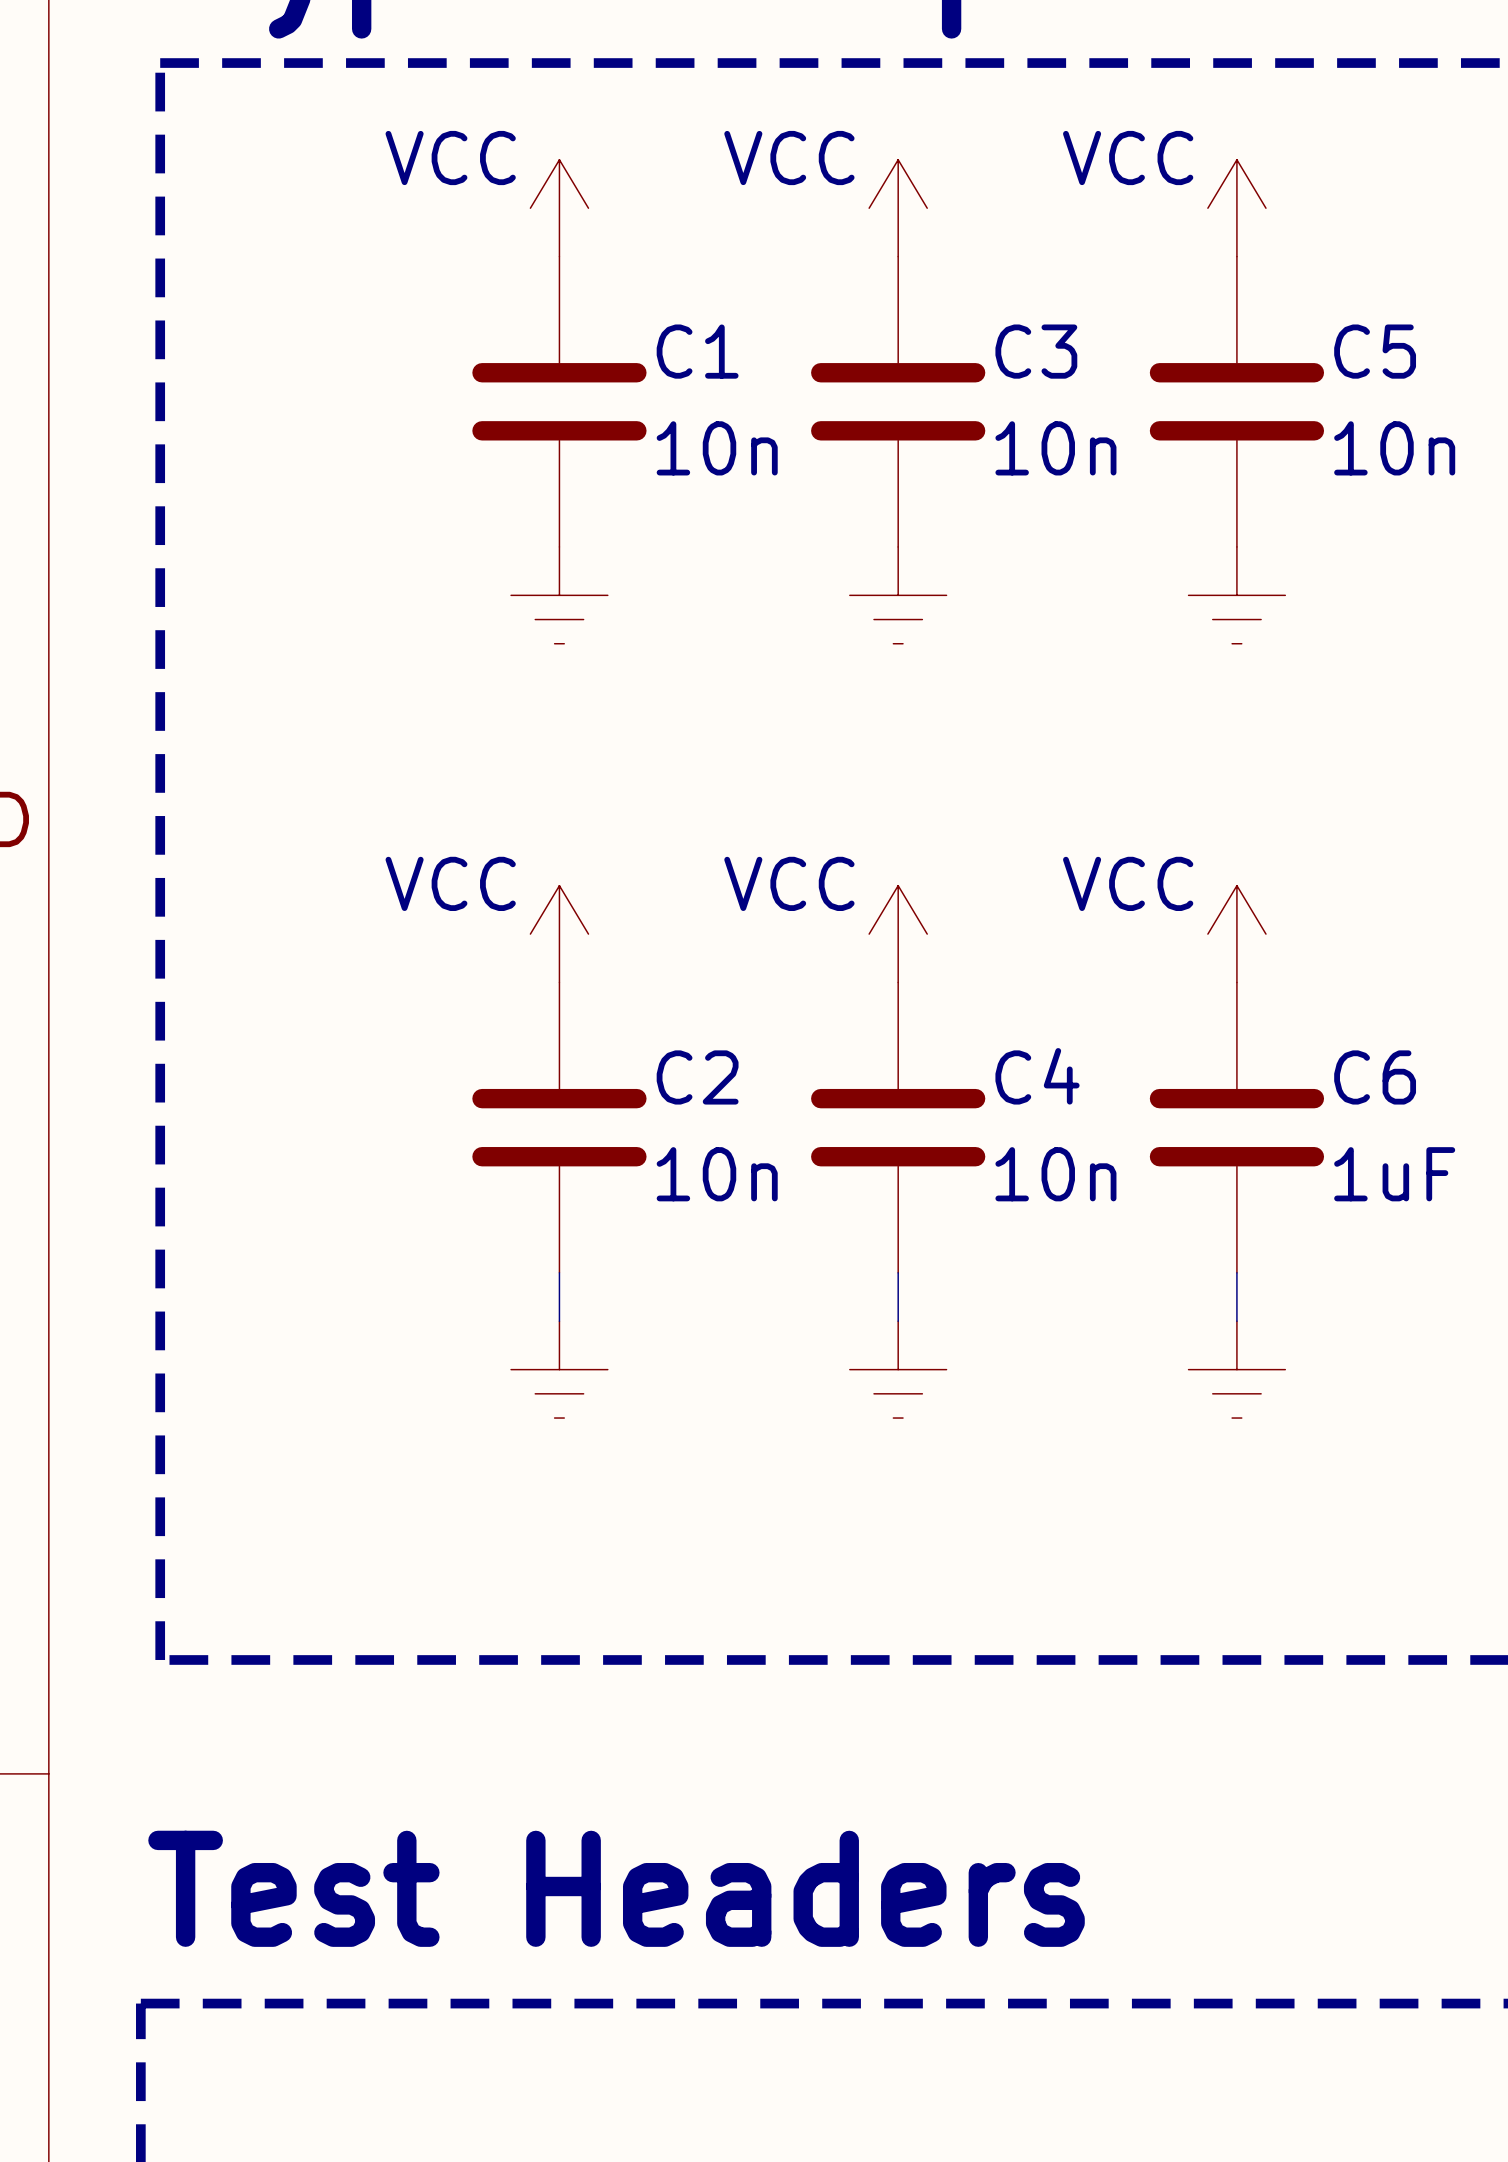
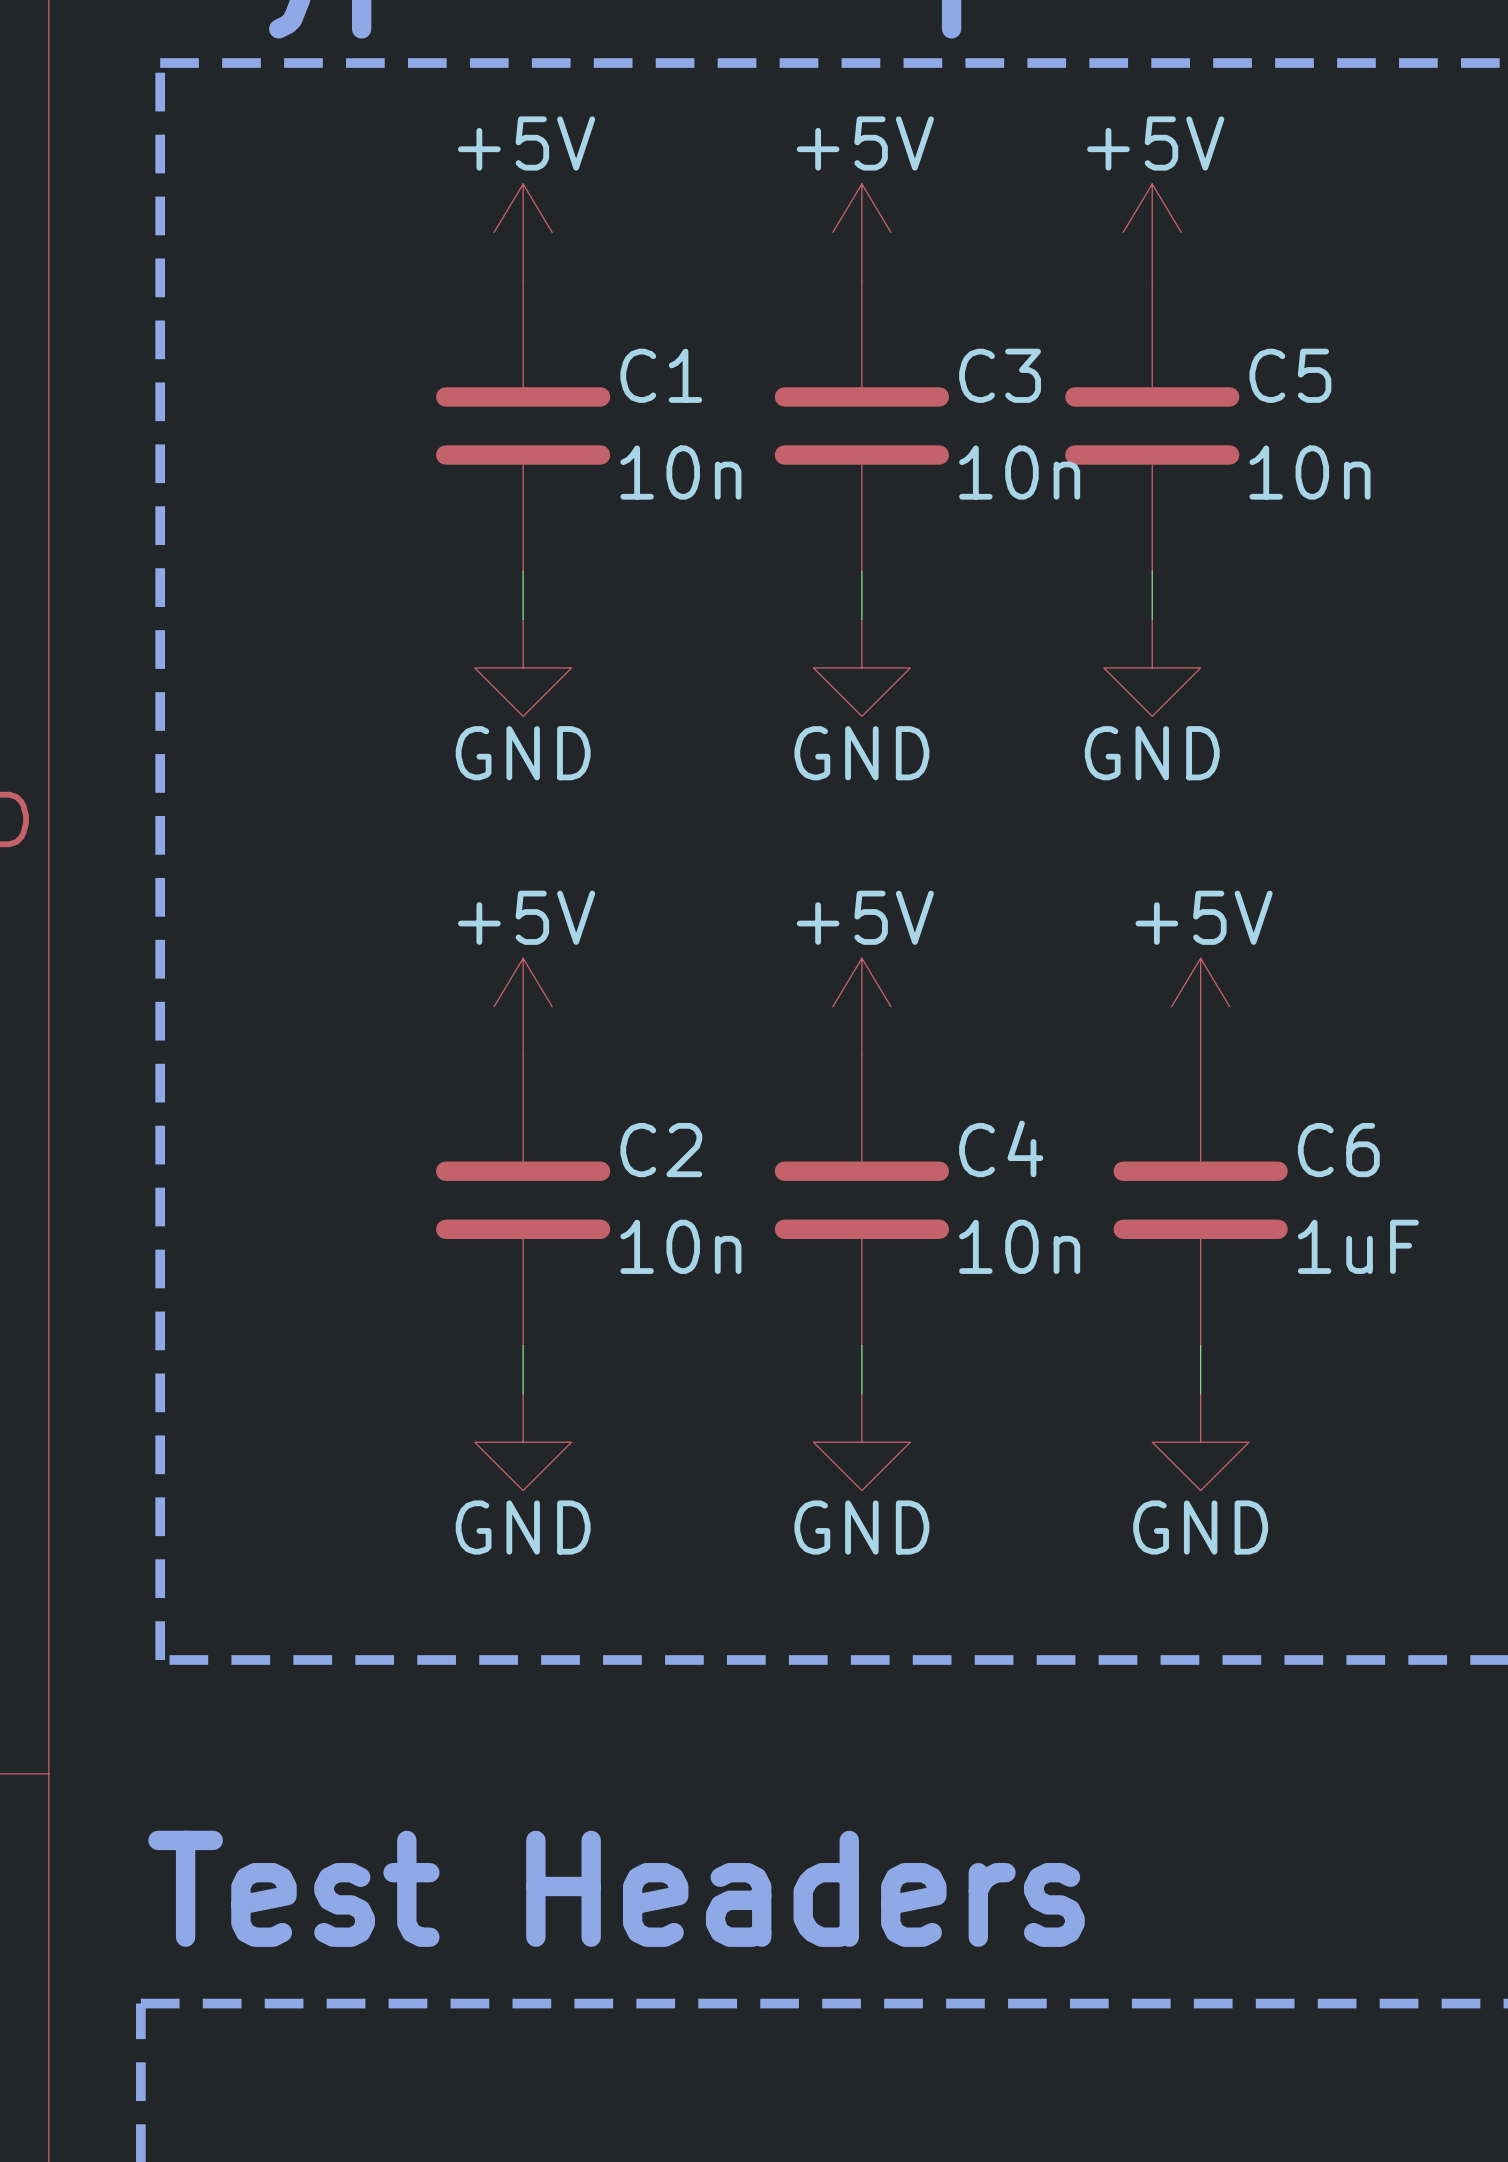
power symbol: VCC (559, 208) -> none
power symbol: VCC (898, 208) -> none
power symbol: VCC (1236, 208) -> none
power symbol: none -> +5V (523, 232)
power symbol: none -> +5V (861, 232)
power symbol: none -> +5V (1152, 232)
C1 position: (559, 401) -> (523, 425)
C3 position: (898, 401) -> (861, 425)
C5 position: (1236, 401) -> (1152, 425)
wire: none -> (523, 571) (523, 619)
wire: none -> (861, 571) (861, 619)
wire: none -> (1152, 571) (1152, 619)
power symbol: (559, 595) -> none
power symbol: (898, 595) -> none
power symbol: (1236, 595) -> none
power symbol: none -> GND (523, 667)
power symbol: none -> GND (861, 667)
power symbol: none -> GND (1152, 667)
power symbol: VCC (559, 934) -> none
power symbol: VCC (898, 934) -> none
power symbol: VCC (1236, 934) -> none
power symbol: none -> +5V (523, 1006)
power symbol: none -> +5V (861, 1006)
power symbol: none -> +5V (1200, 1006)
C2 position: (559, 1127) -> (523, 1200)
C4 position: (898, 1127) -> (861, 1200)
C6 position: (1236, 1127) -> (1200, 1200)
wire: (559, 1272) (559, 1321) -> (523, 1345) (523, 1393)
wire: (898, 1272) (898, 1321) -> (861, 1345) (861, 1393)
wire: (1236, 1272) (1236, 1321) -> (1200, 1345) (1200, 1393)
power symbol: (559, 1369) -> none
power symbol: (898, 1369) -> none
power symbol: (1236, 1369) -> none
power symbol: none -> GND (523, 1442)
power symbol: none -> GND (861, 1442)
power symbol: none -> GND (1200, 1442)

